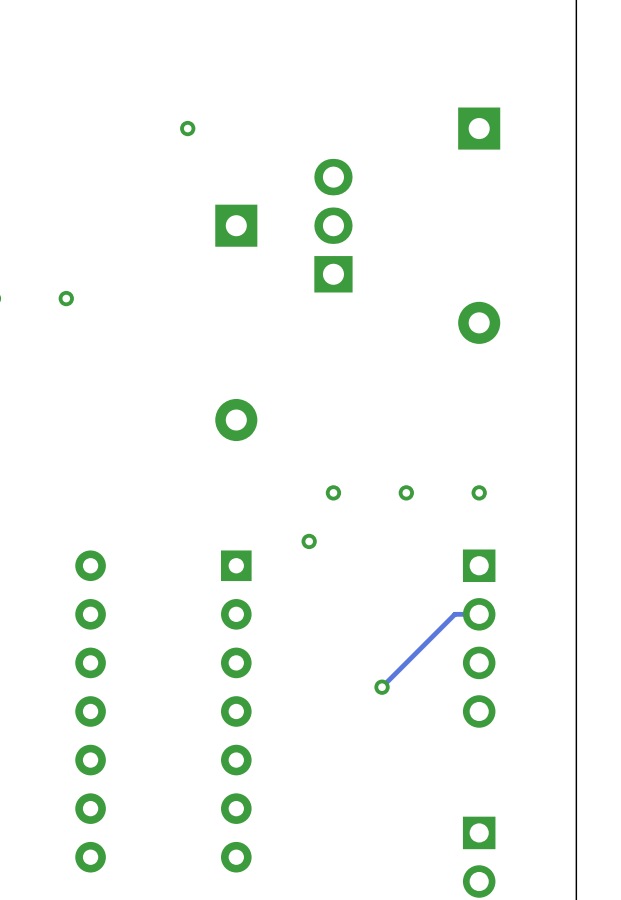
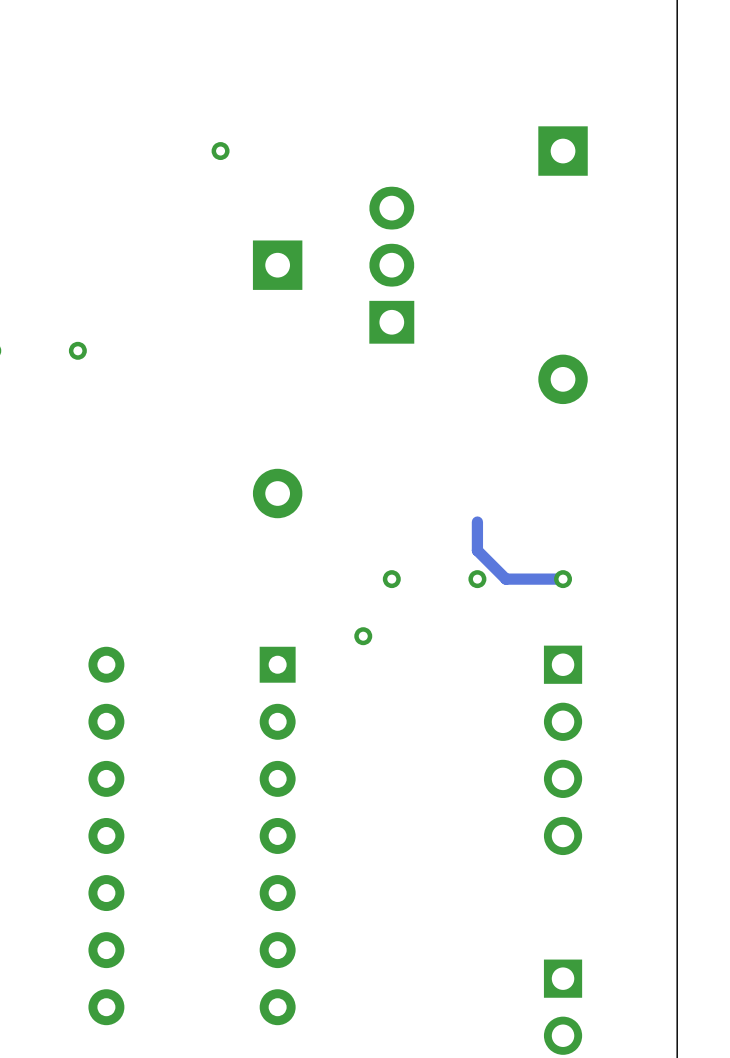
track: none -> (477, 522) (477, 550) (505, 579) (563, 579)
track: (479, 614) (454, 614) (382, 687) -> none
via: (382, 687) -> none

